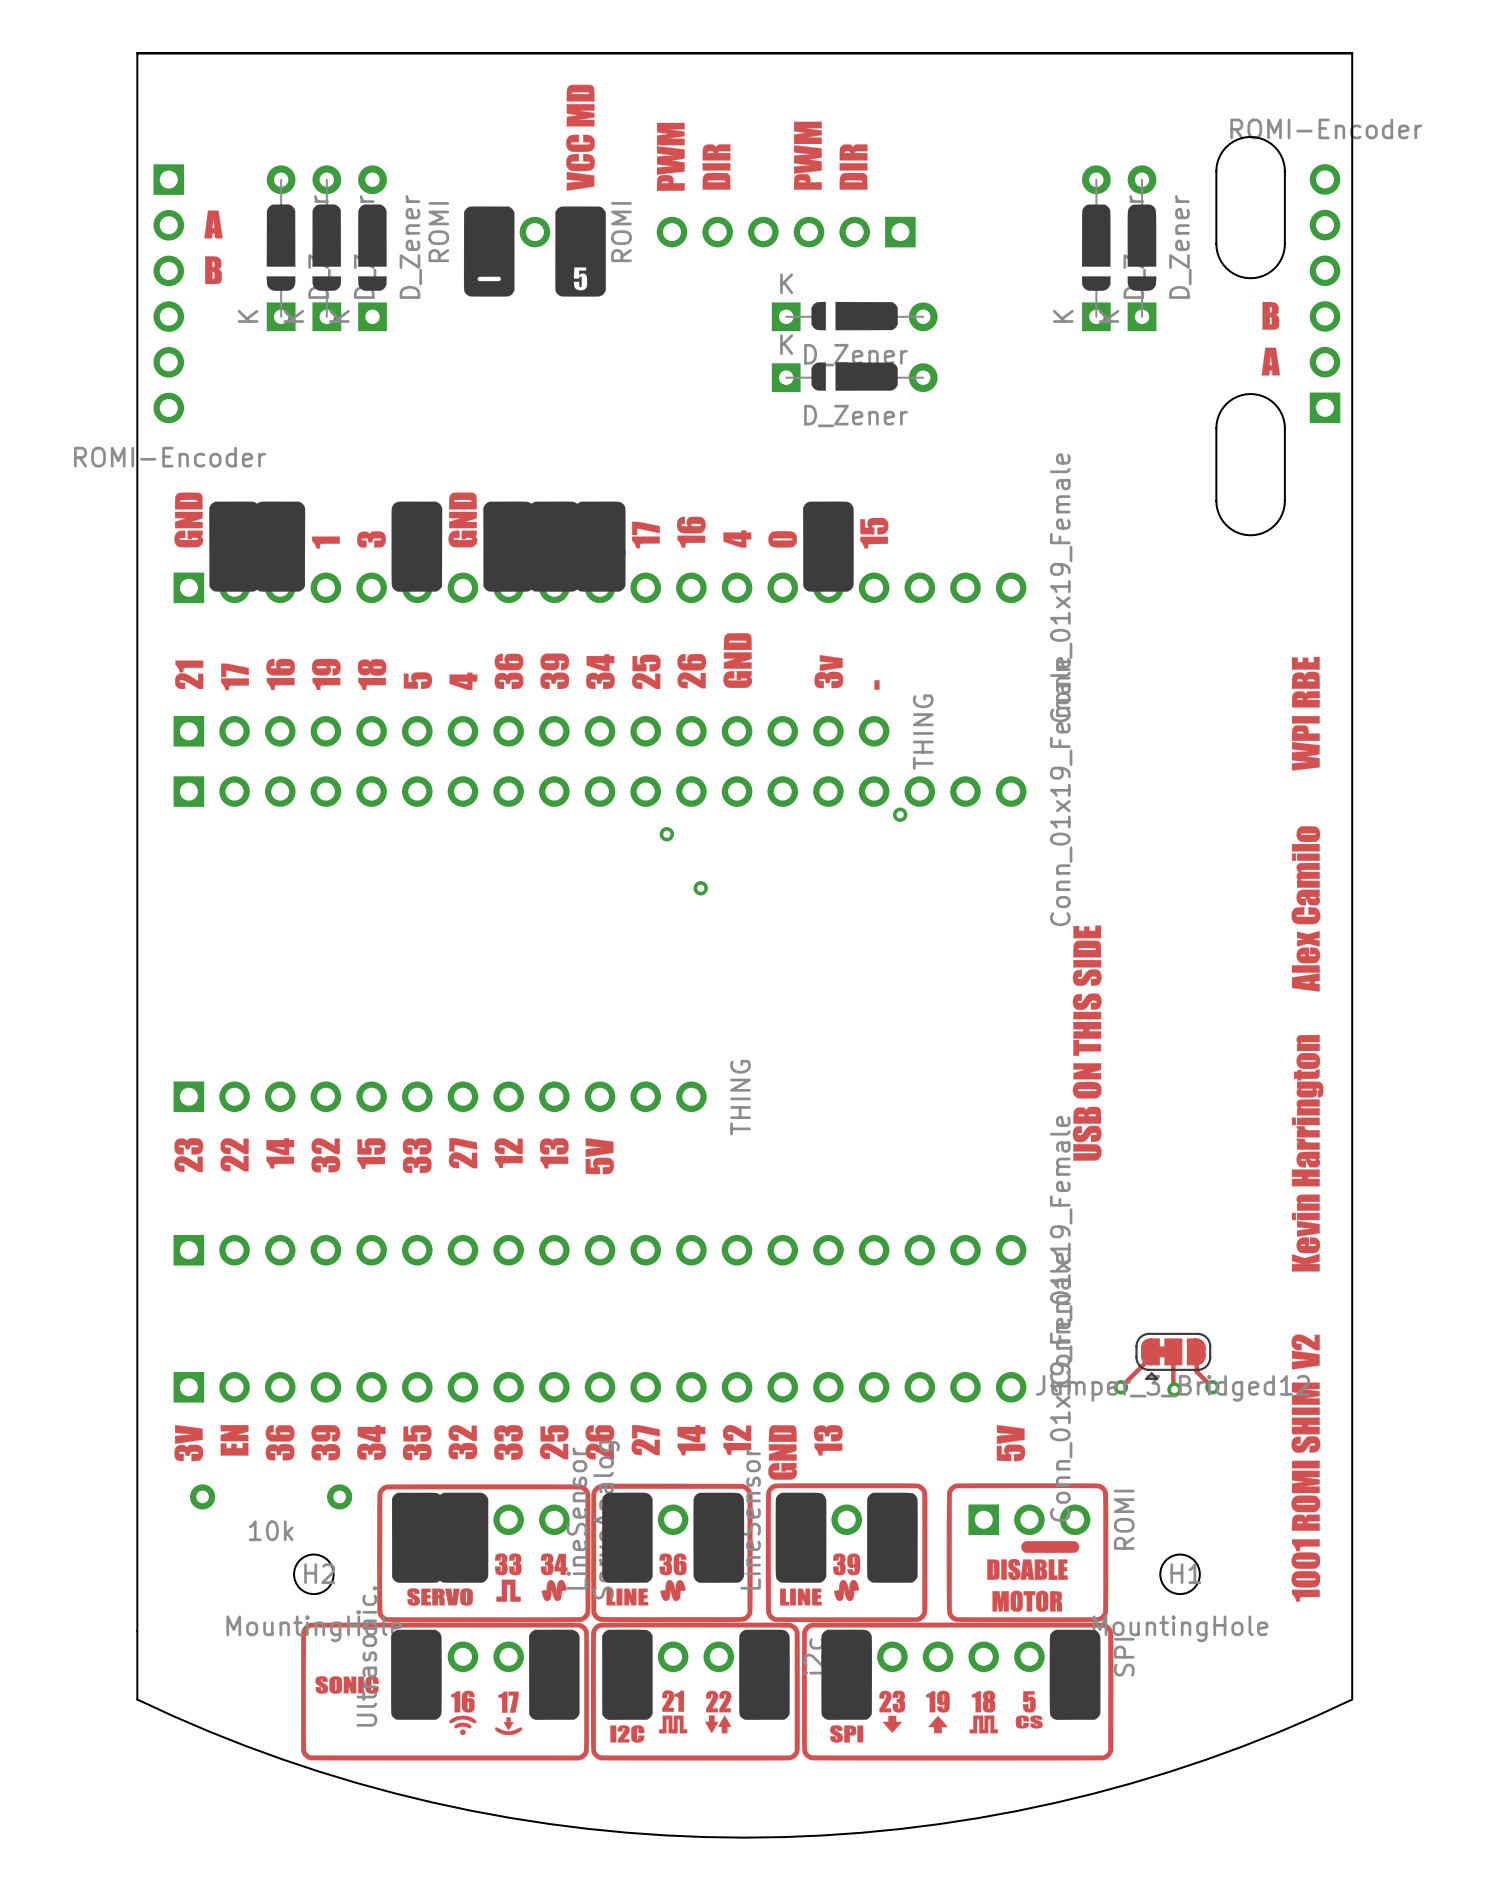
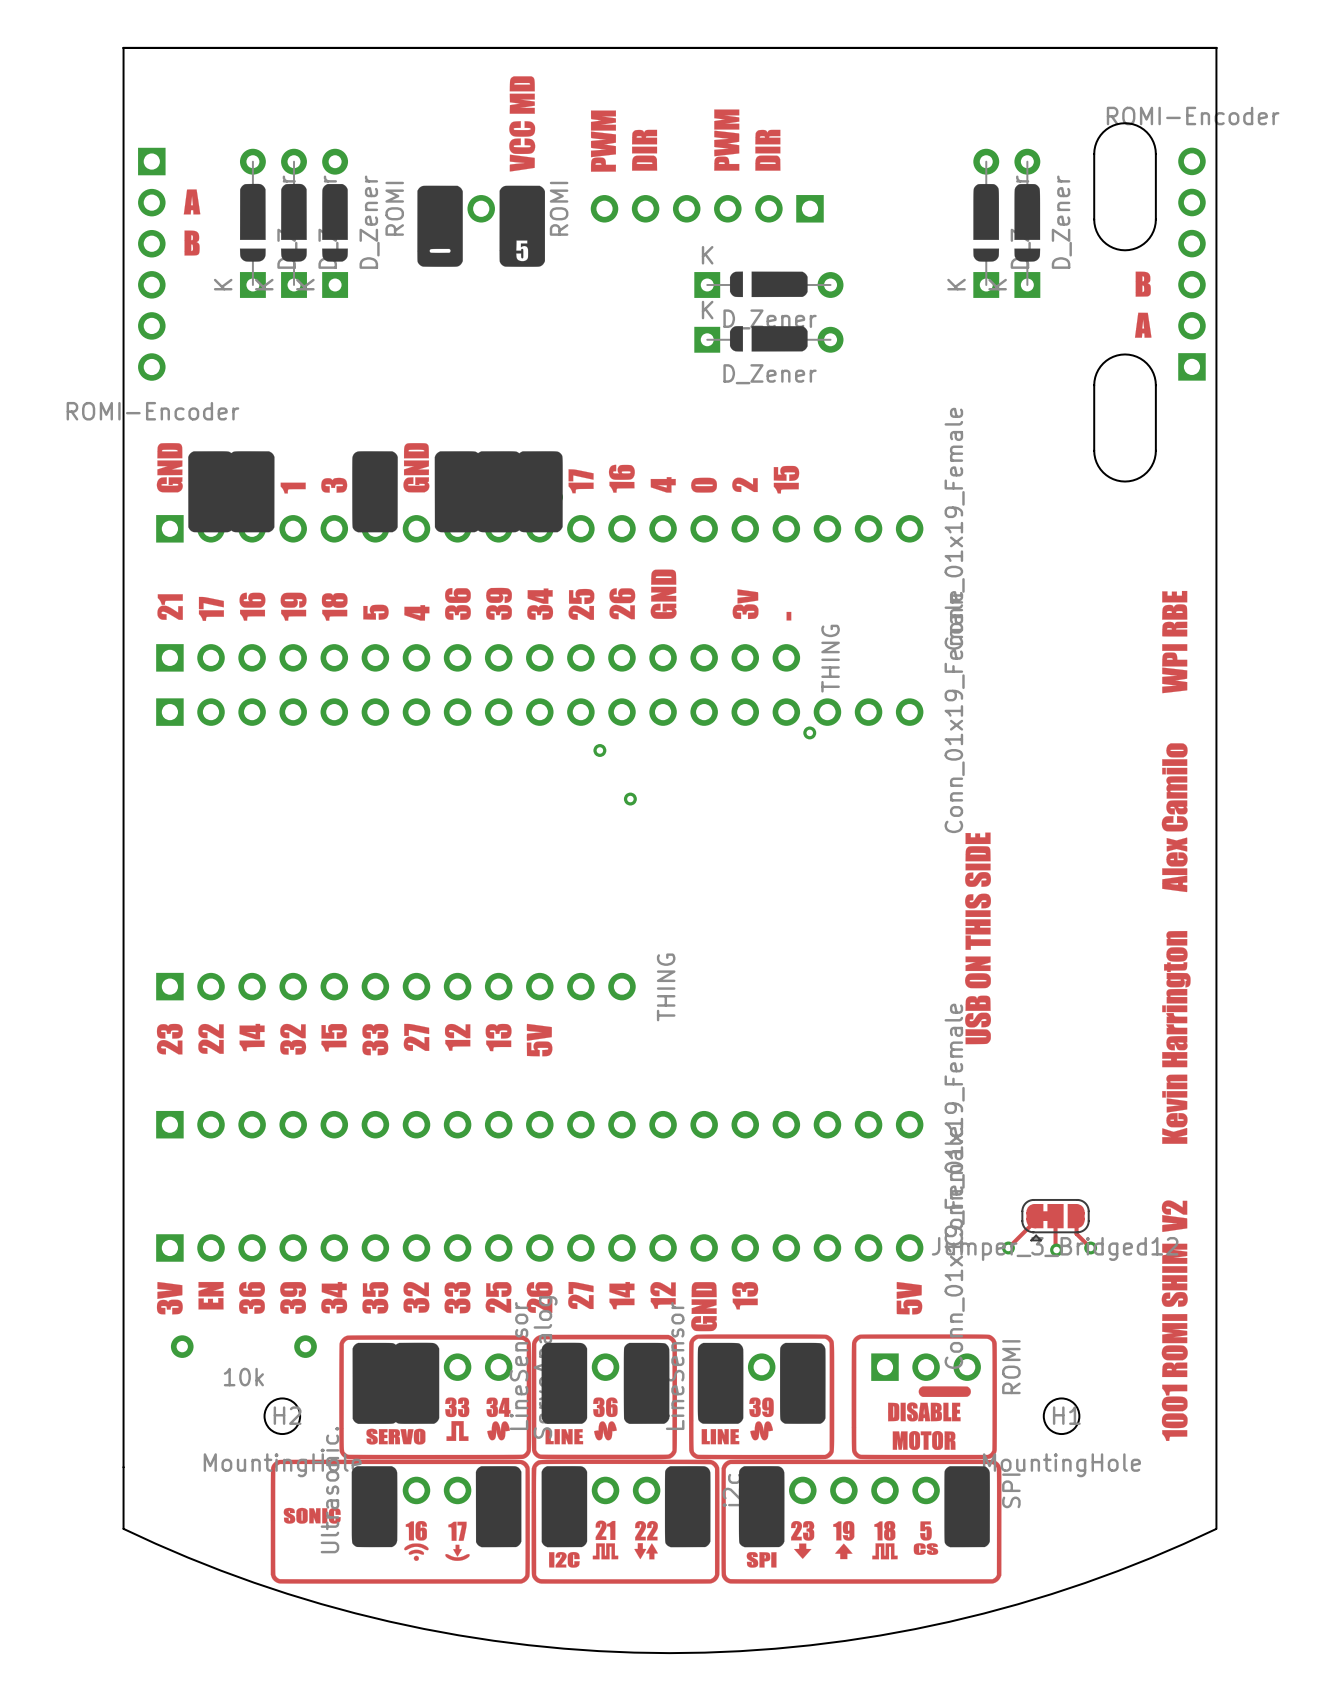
drawing shape: [174, 84, 1324, 1761] -> [156, 76, 1191, 1584]

